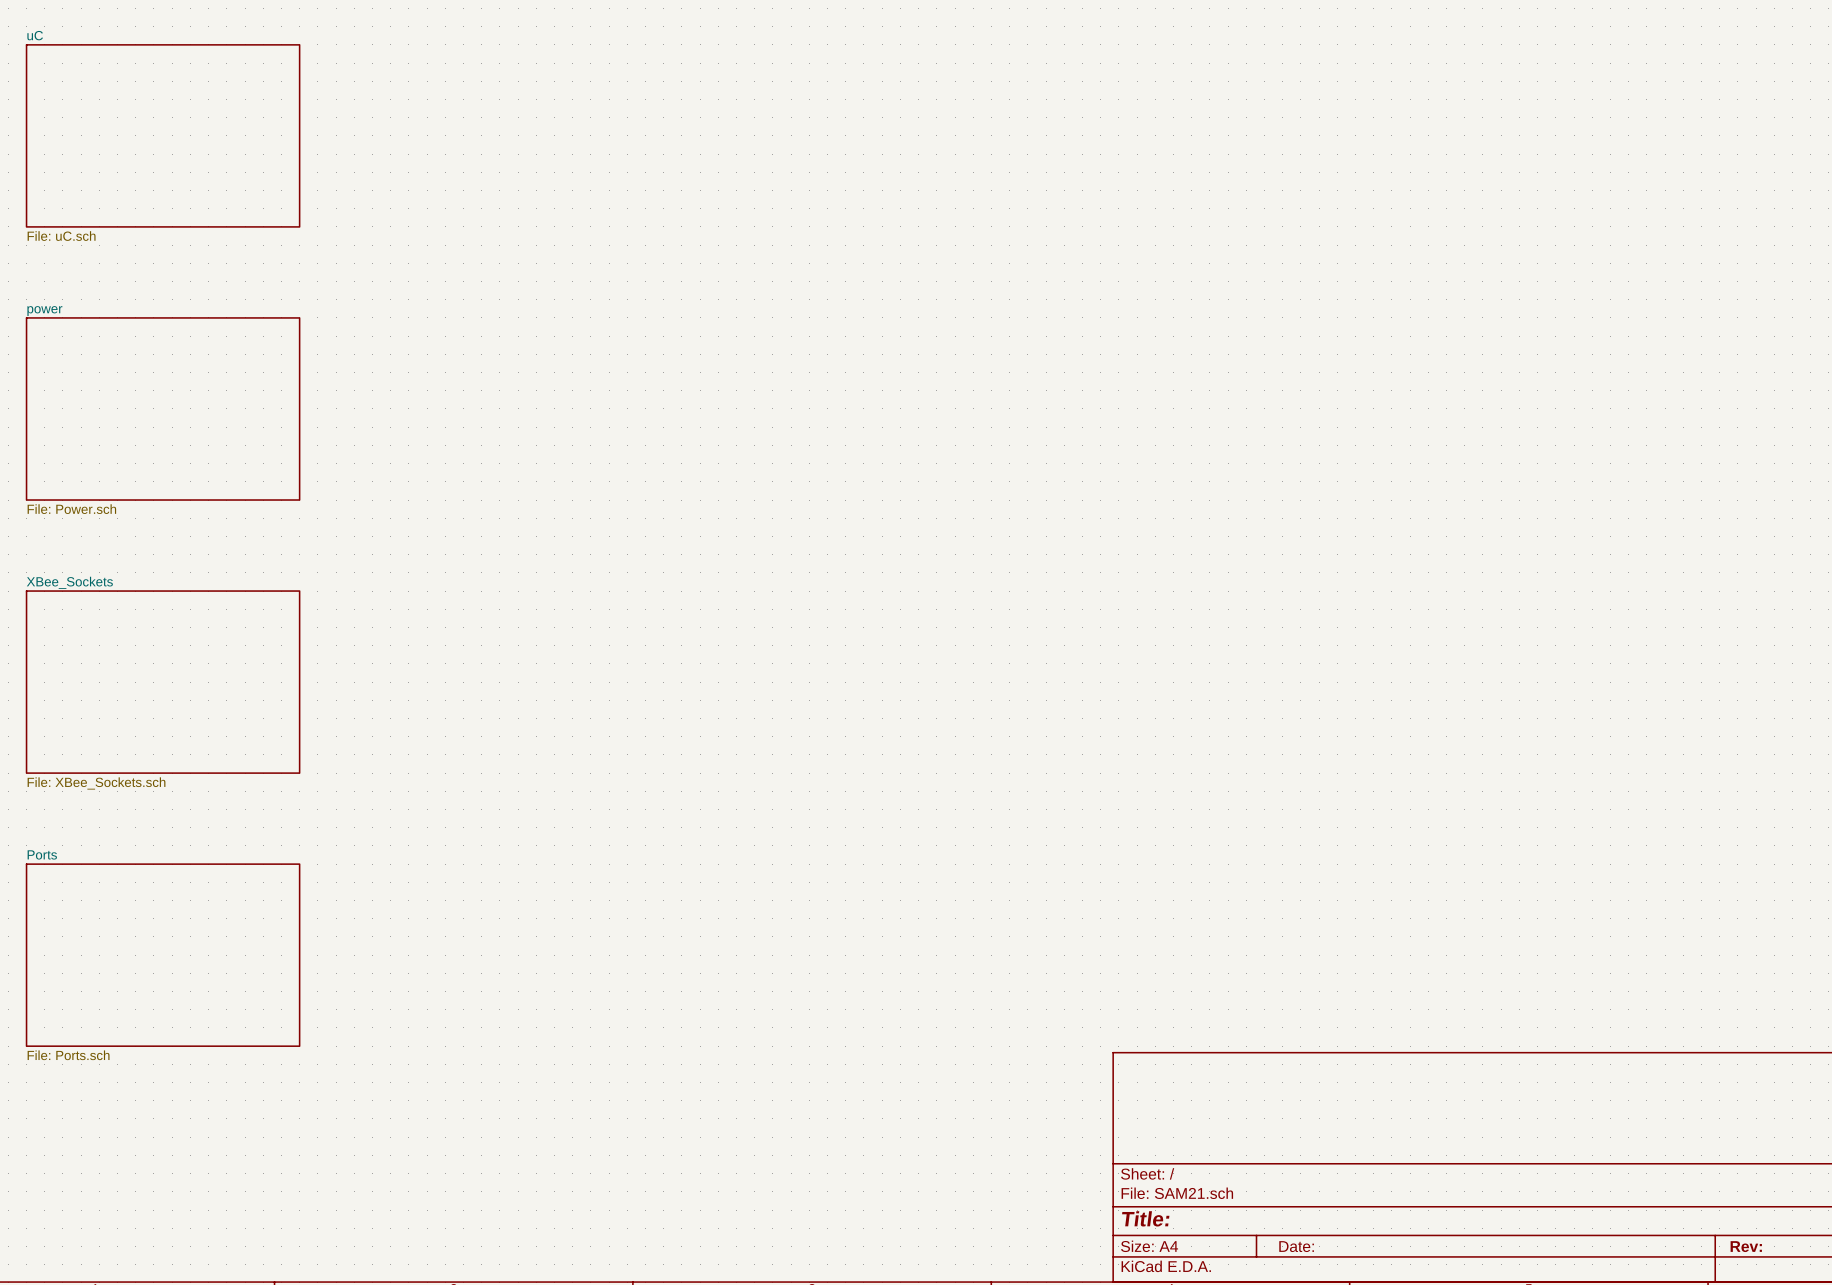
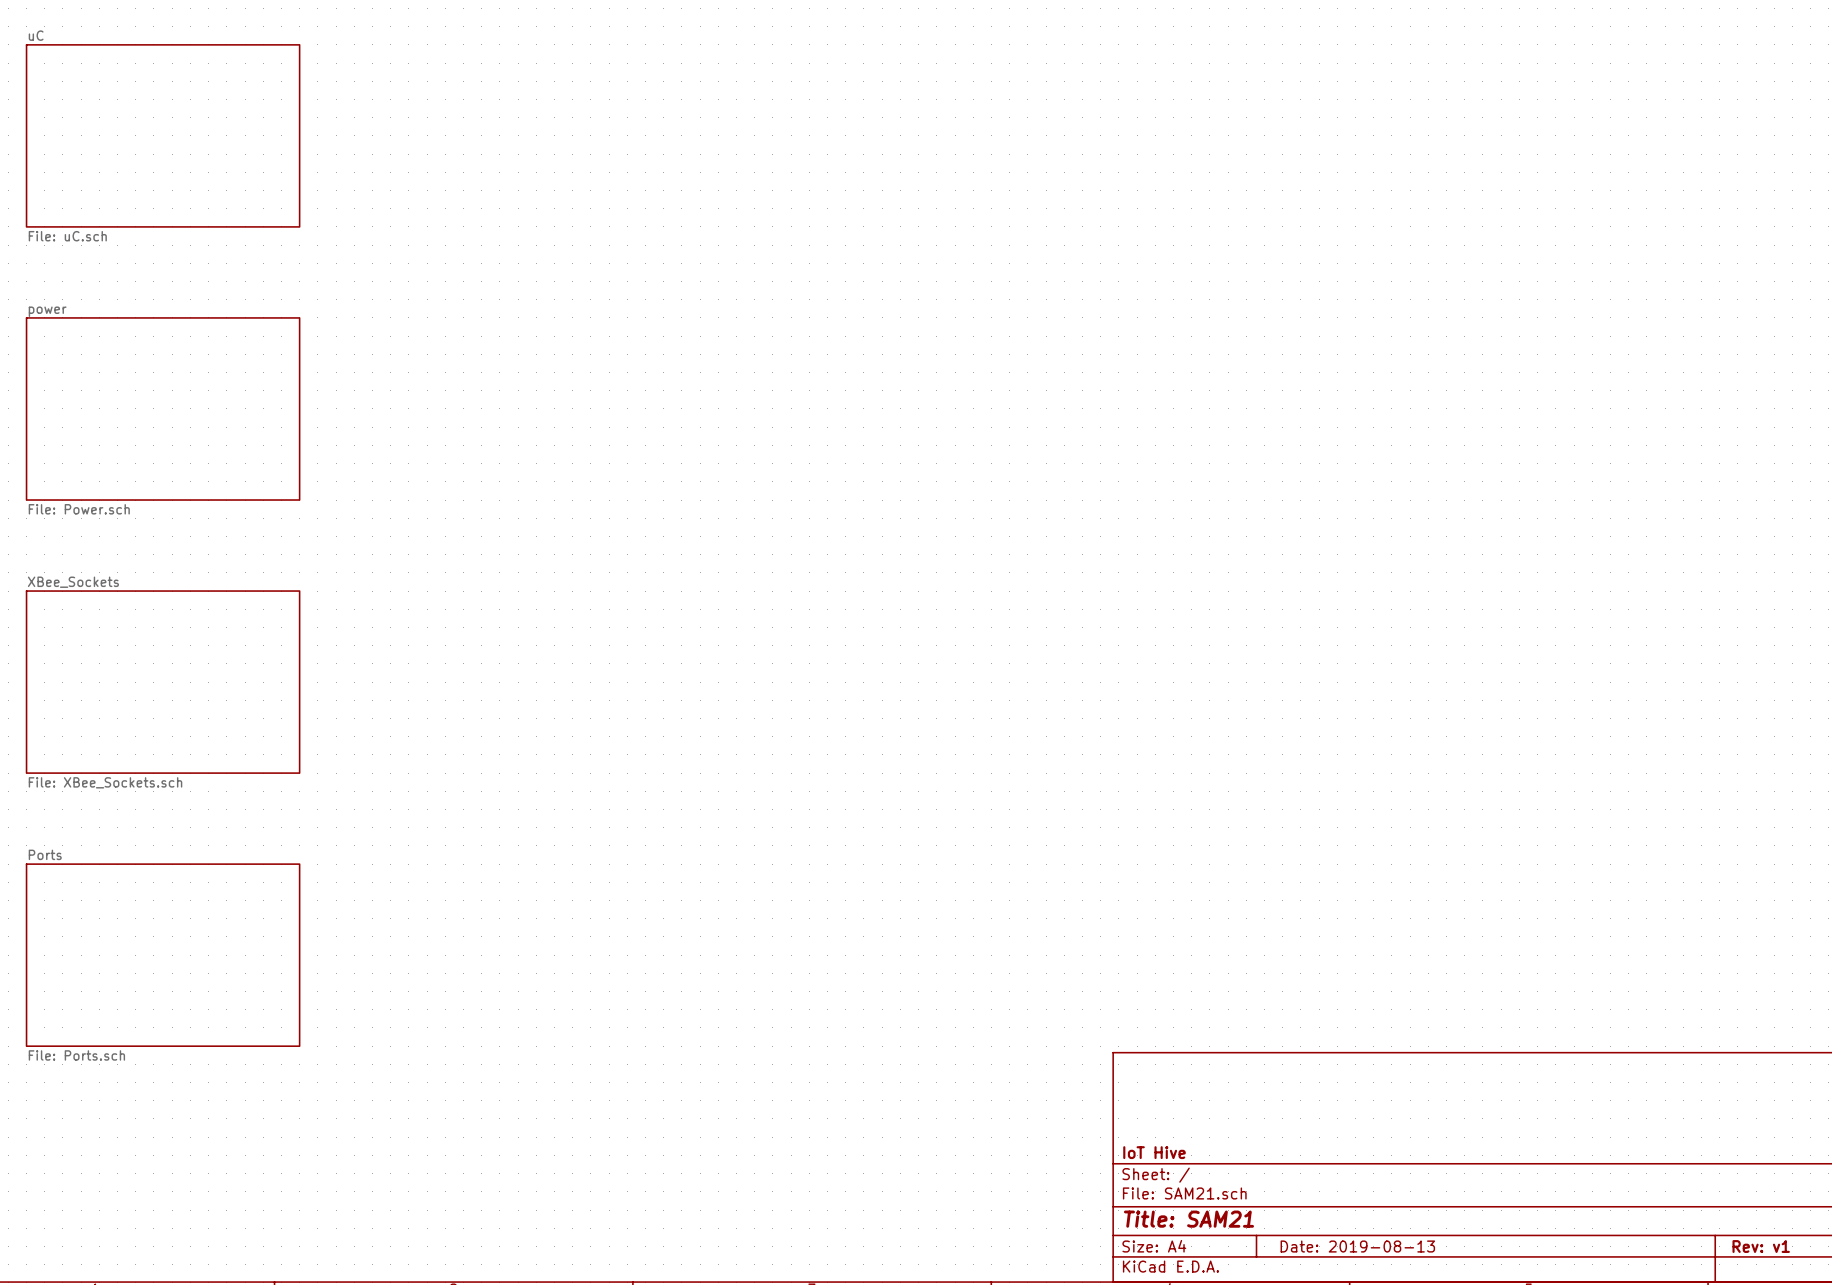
title block: none -> IoT Hive (1154, 1152)
title block: Title: (1145, 1218) -> Title: SAM21 (1188, 1219)
title block: Date: (1296, 1246) -> Date: 2019-08-13 (1357, 1246)
title block: Rev: (1746, 1246) -> Rev: v1 (1761, 1246)

